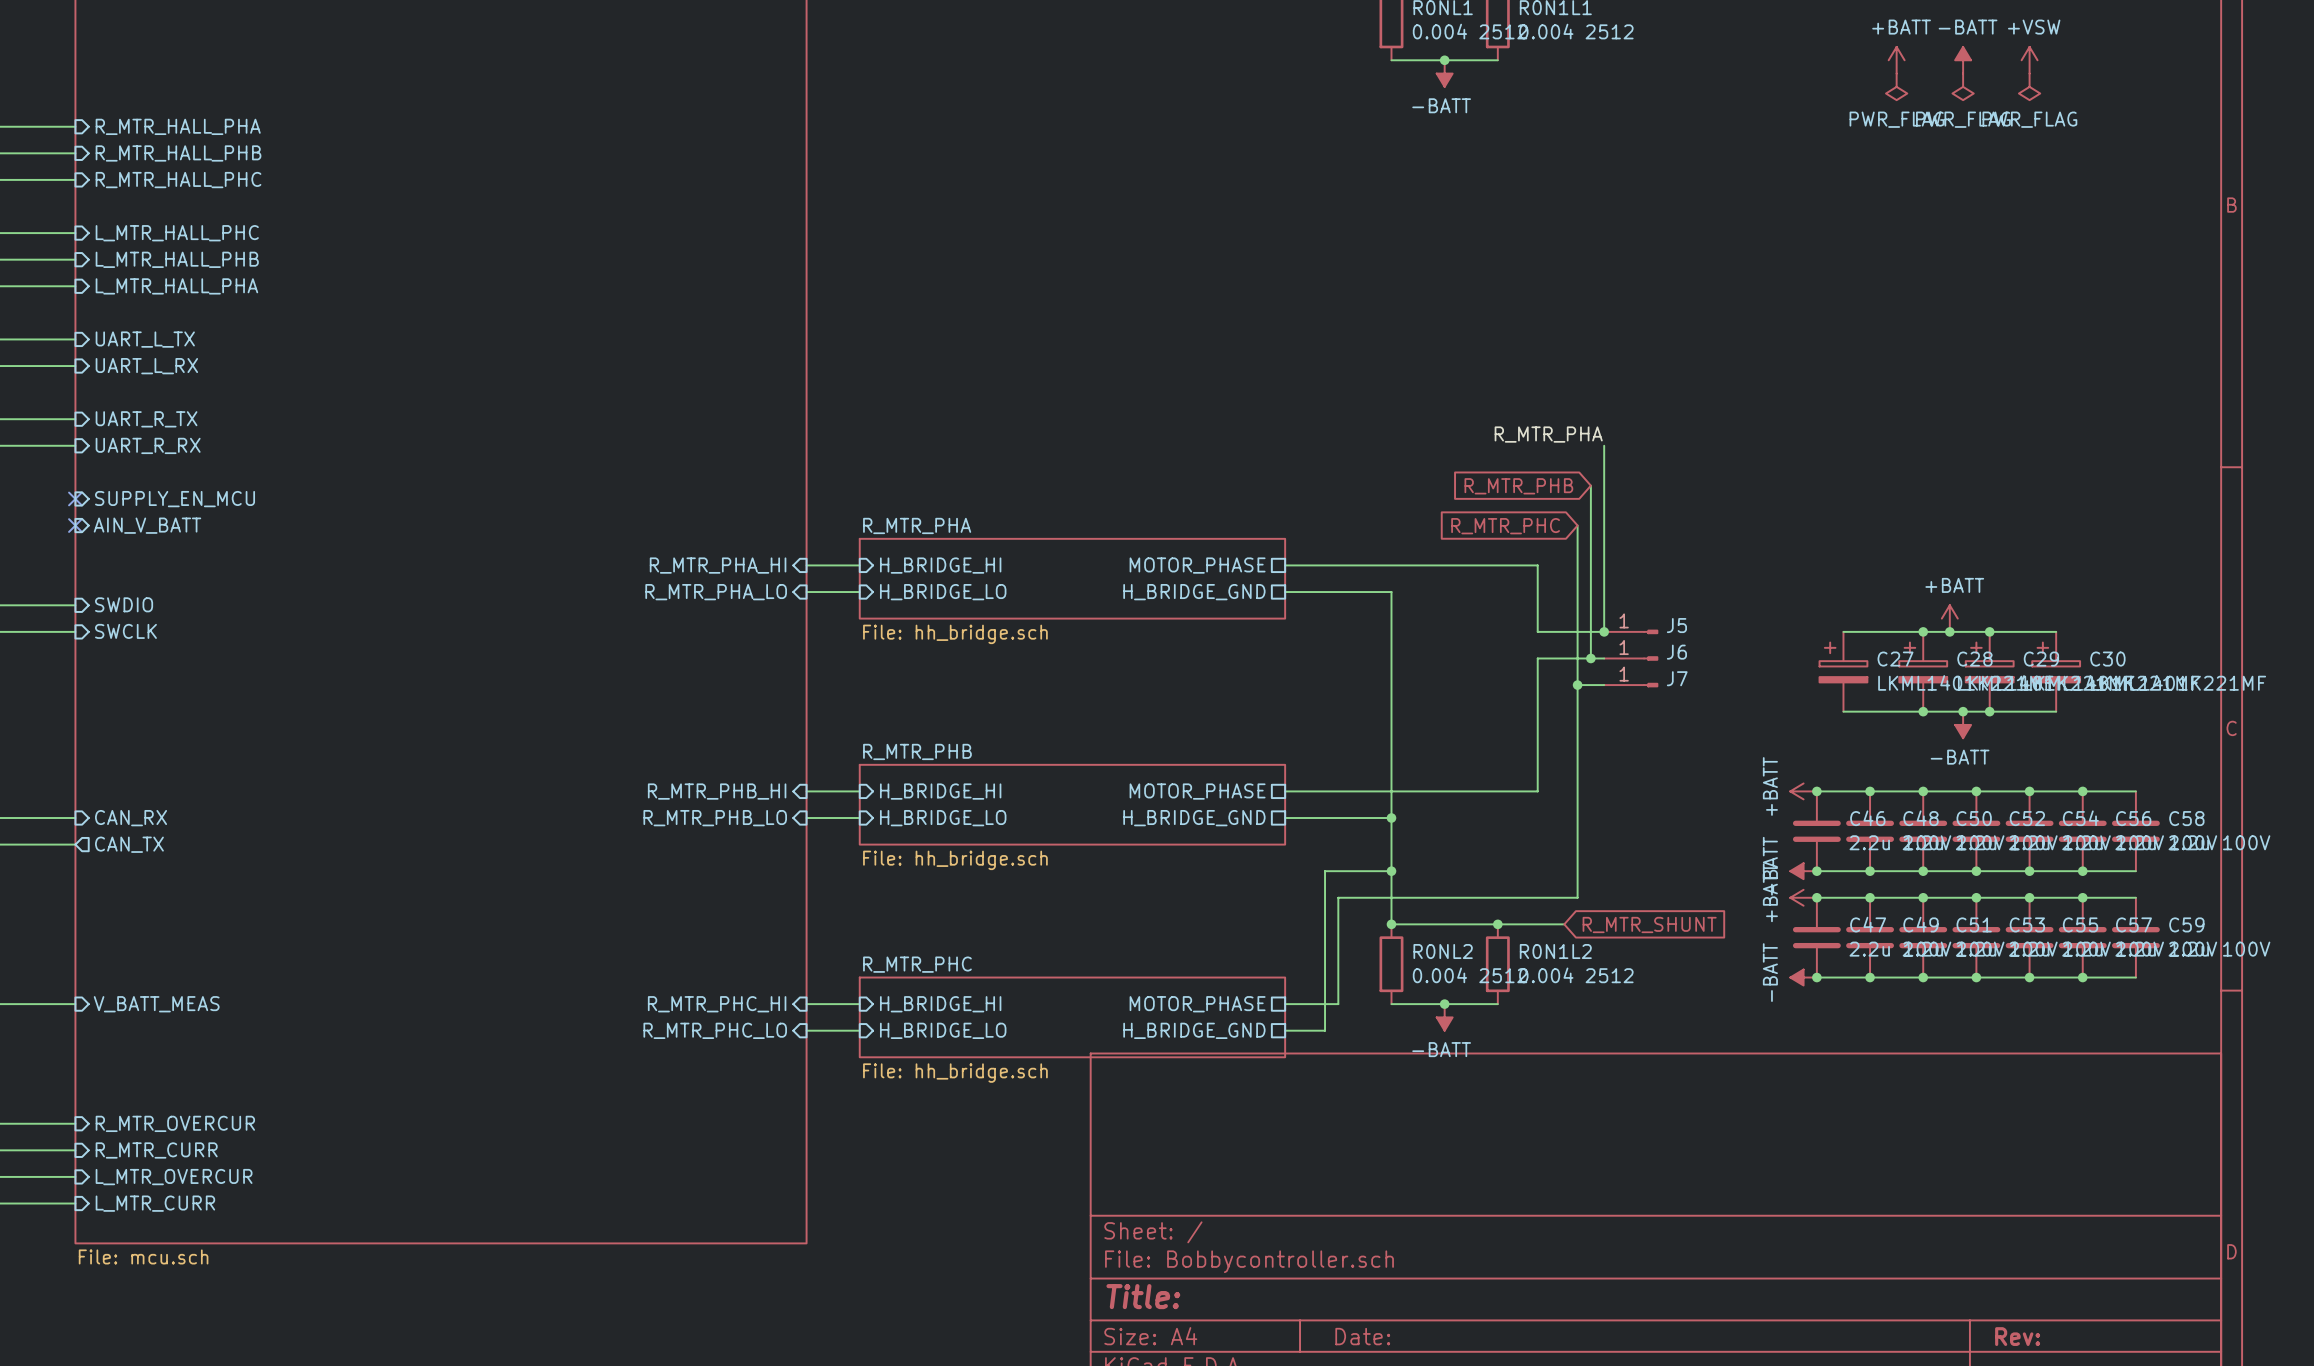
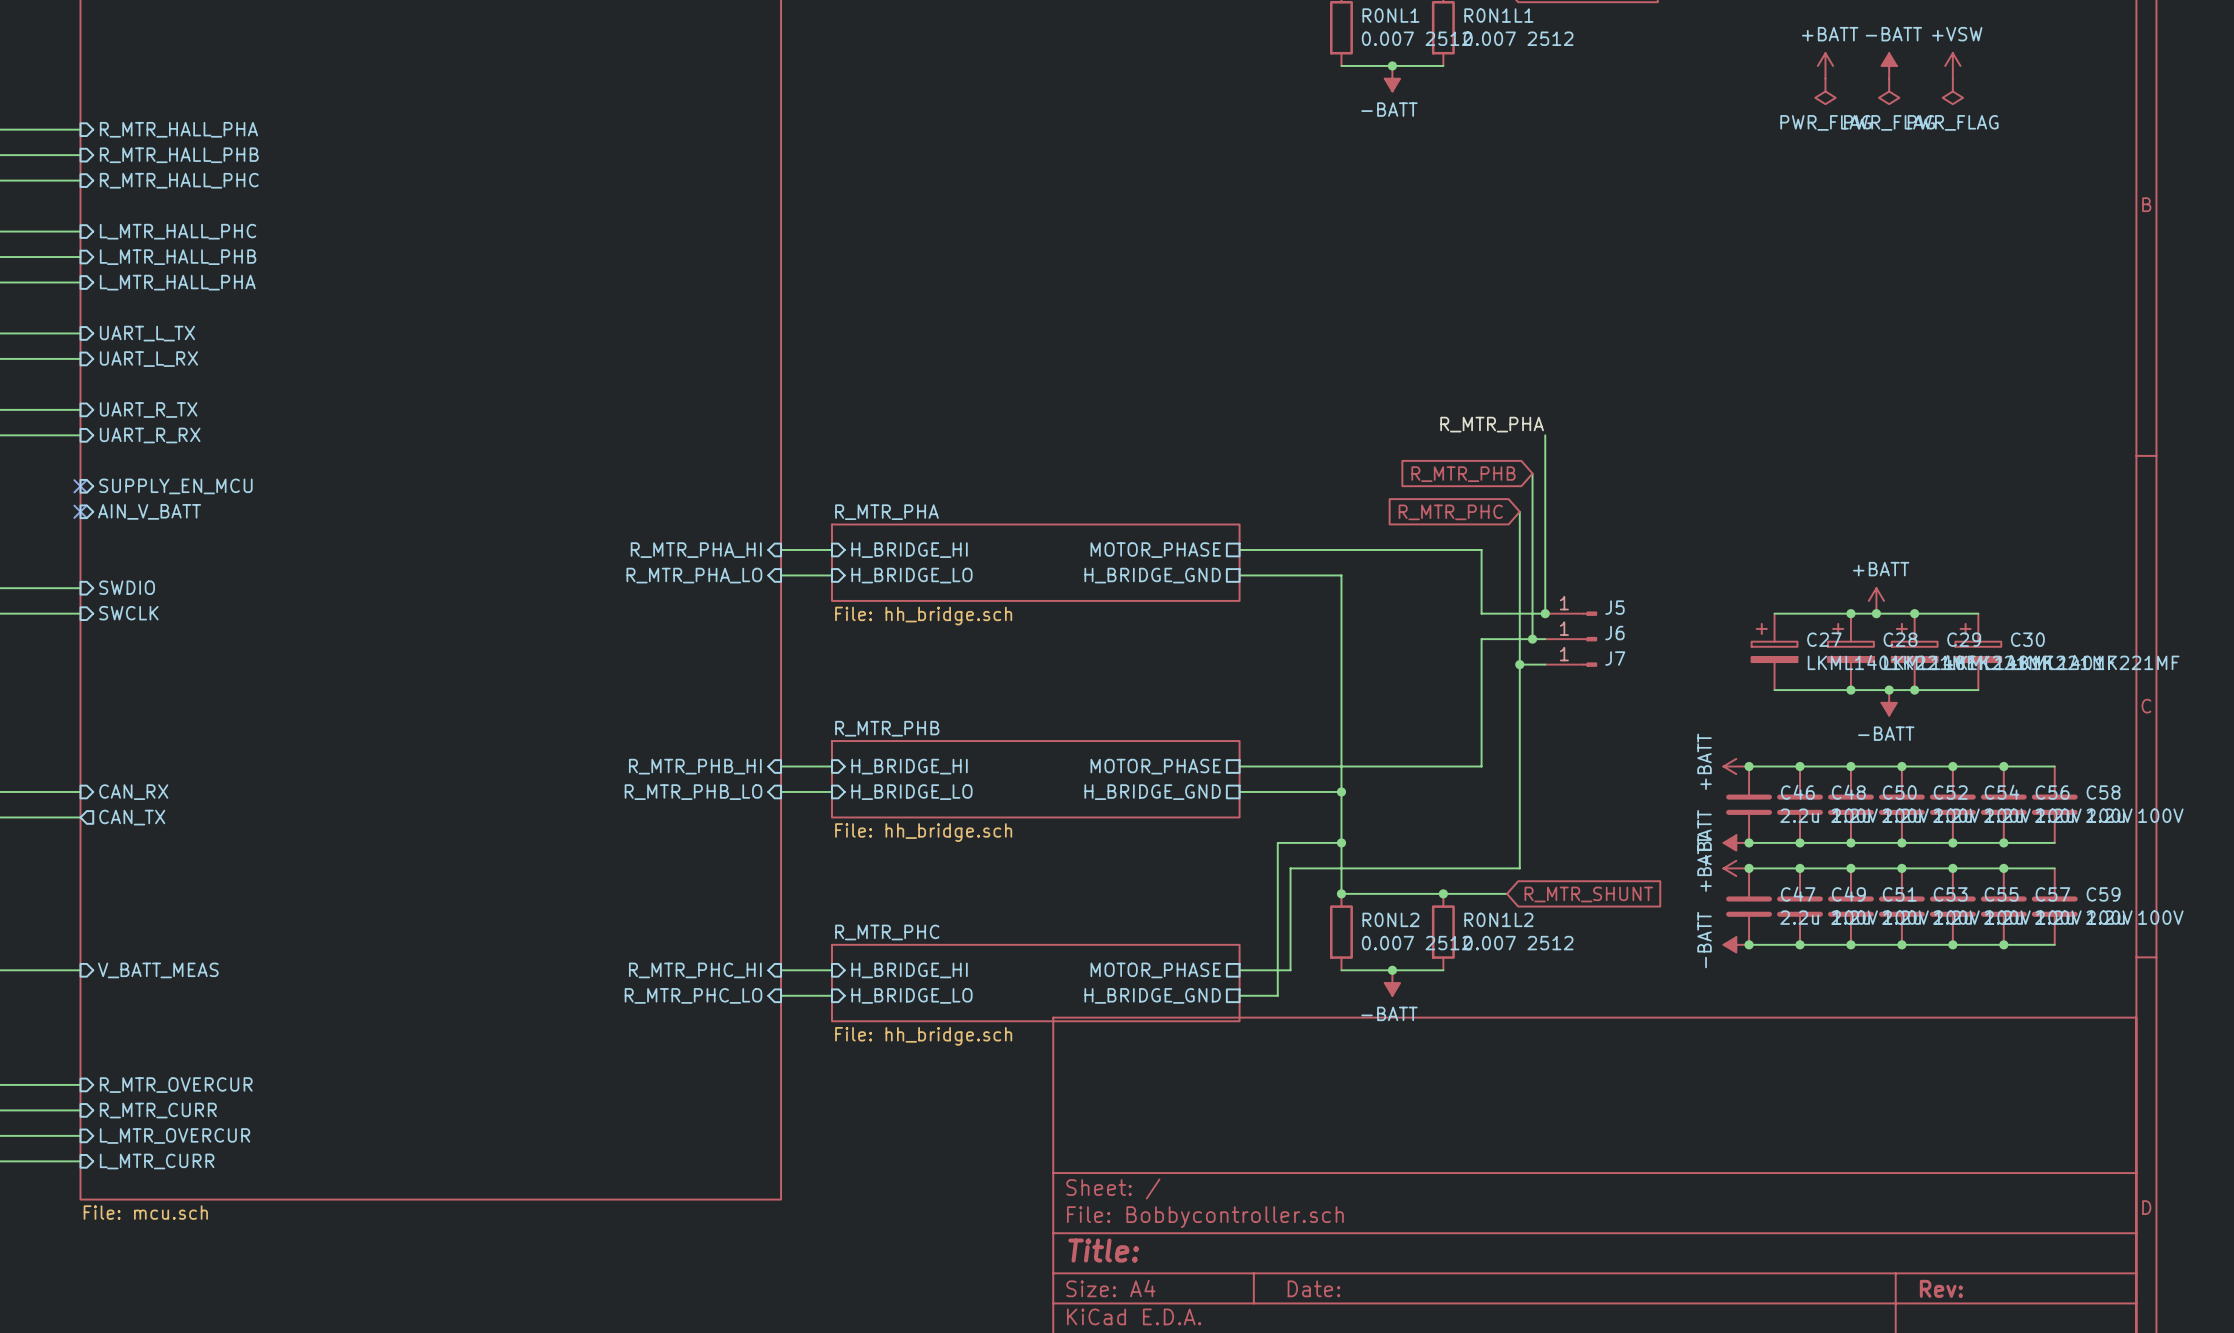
R0NL1 value: 0.004 2512 (1470, 31) -> 0.007 2512 (1416, 38)
R0N1L1 value: 0.004 2512 (1576, 31) -> 0.007 2512 (1518, 38)
R0NL2 value: 0.004 2512 (1470, 975) -> 0.007 2512 (1416, 943)
R0N1L2 value: 0.004 2512 (1576, 975) -> 0.007 2512 (1518, 943)

